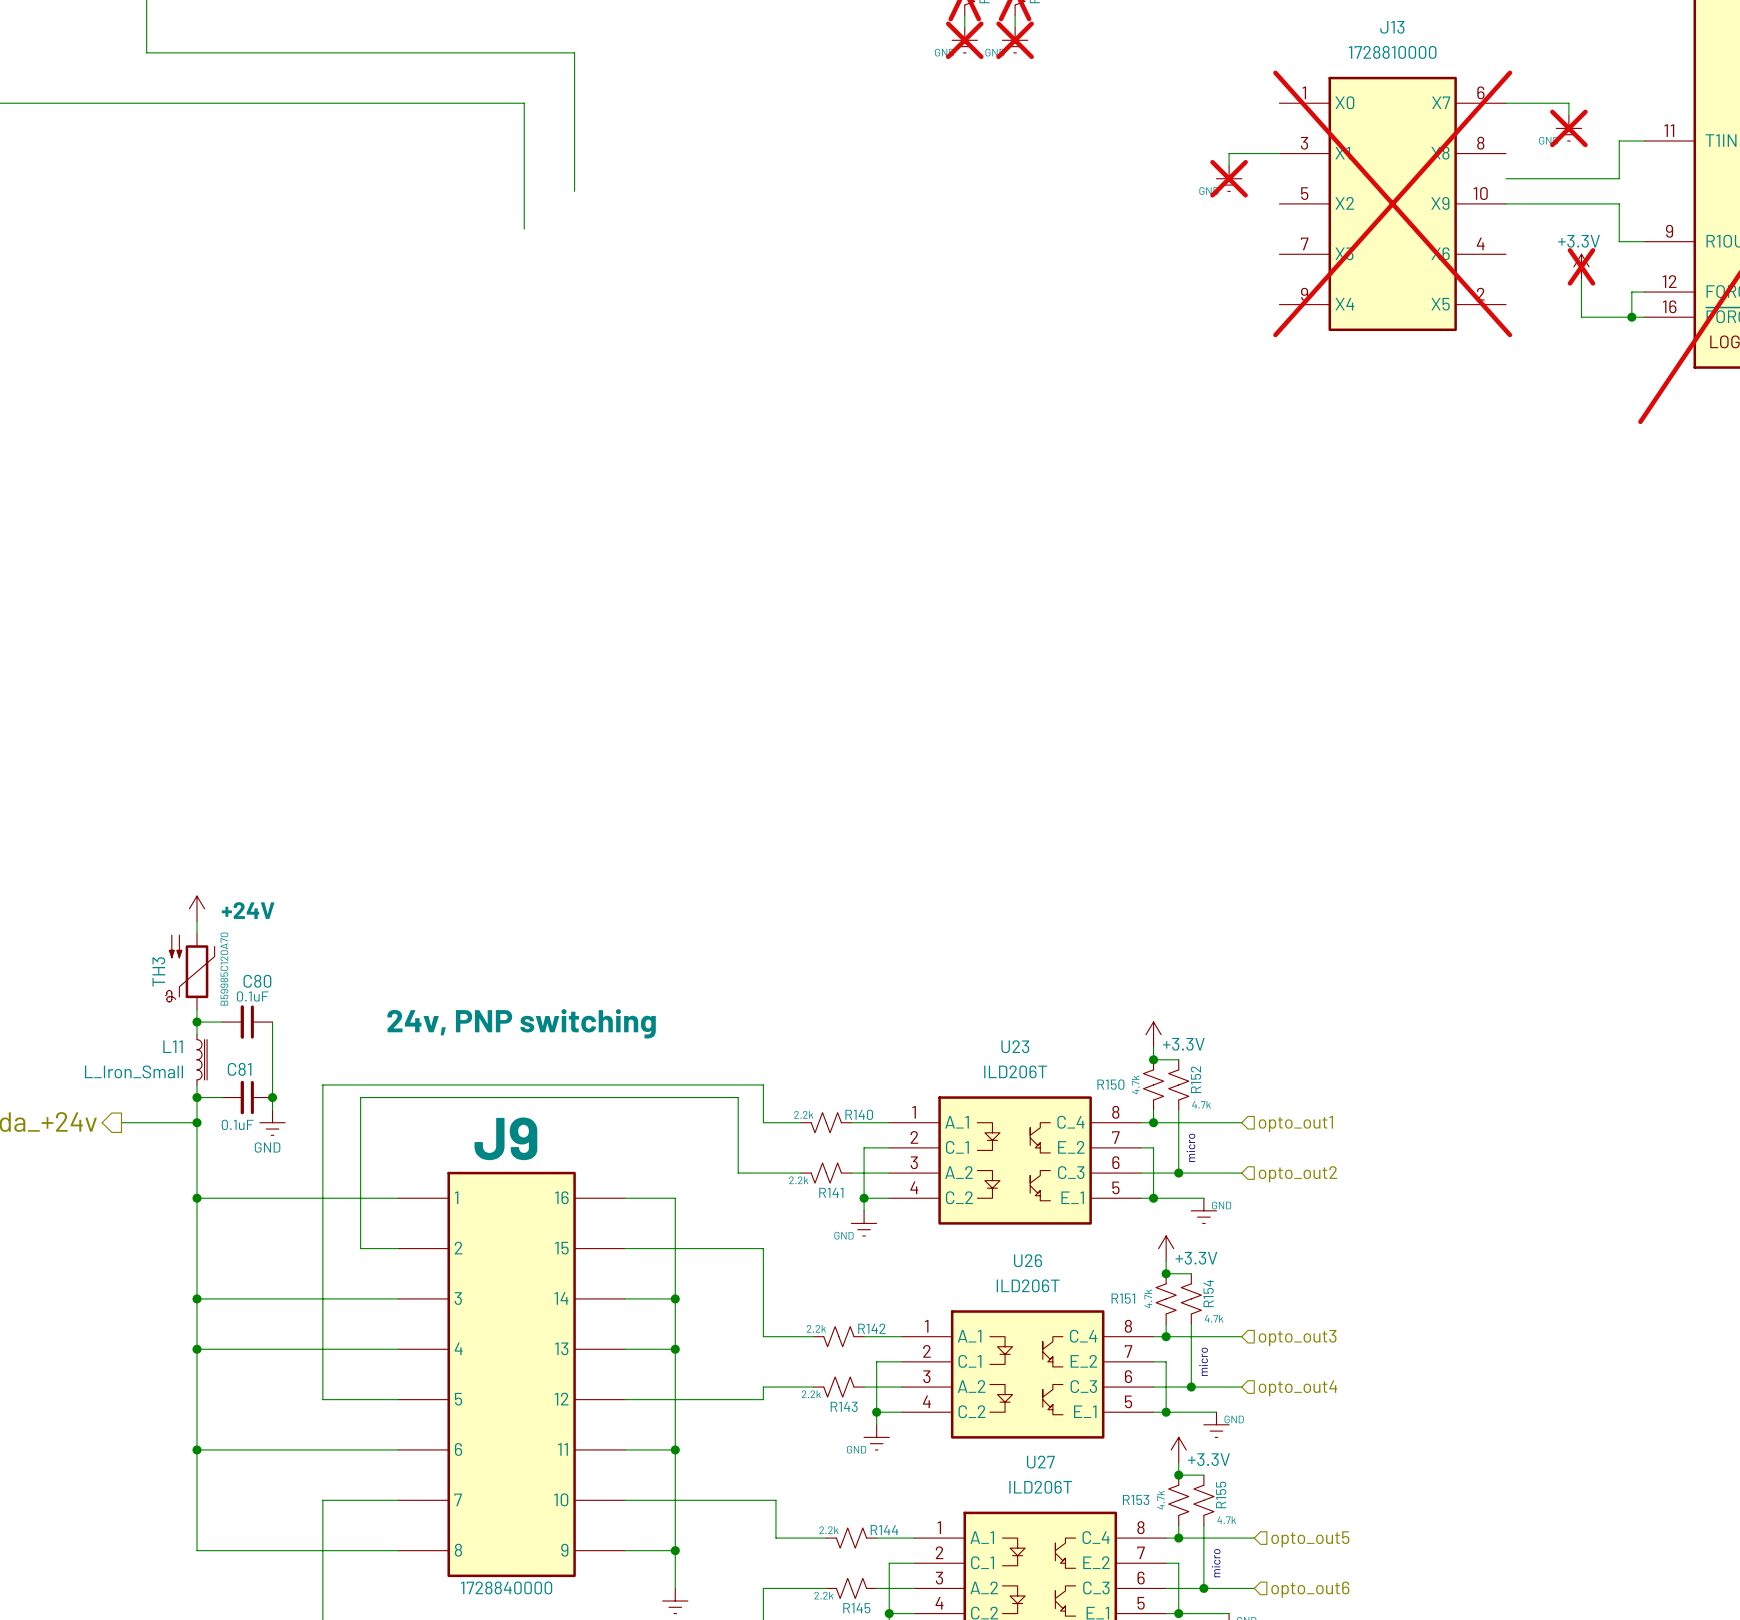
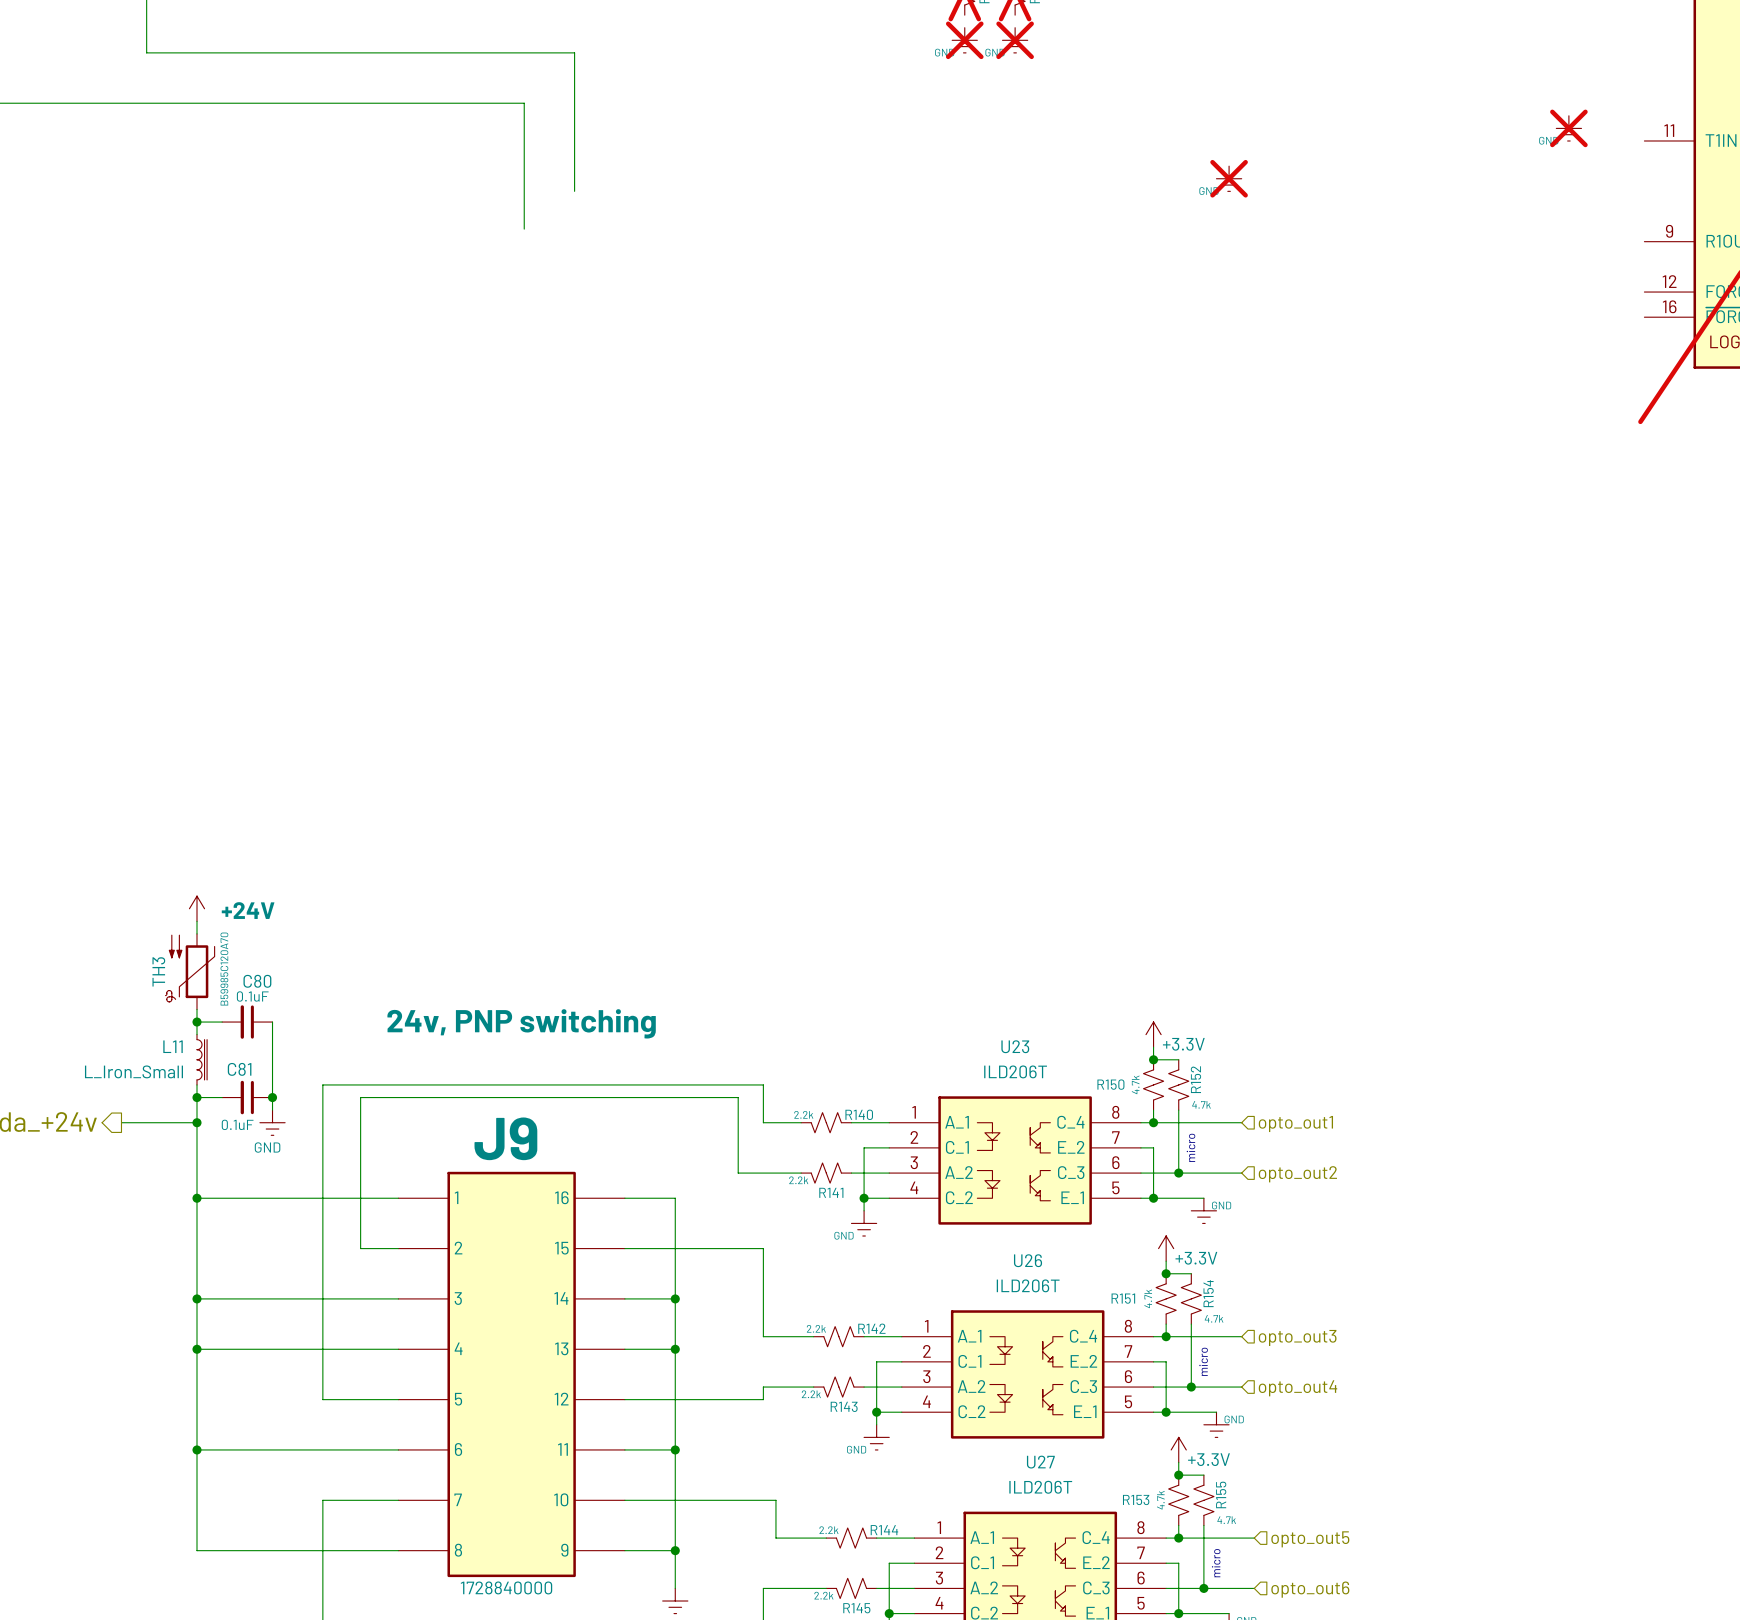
wire: (964, 15) (964, 27) -> none
wire: (1015, 15) (1015, 27) -> none
wire: (1505, 103) (1568, 103) (1568, 115) -> none
wire: (1644, 140) (1619, 140) (1619, 178) (1505, 178) -> none
wire: (1279, 153) (1229, 153) (1229, 166) -> none
J13: 1728810000 (1392, 203) -> none
wire: (1505, 203) (1619, 203) (1619, 241) (1644, 241) -> none
power symbol: +3.3V (1581, 266) -> none
wire: (1581, 279) (1581, 317) (1644, 317) -> none
wire: (1644, 292) (1631, 292) (1631, 317) -> none
junction: (1631, 317) -> none

